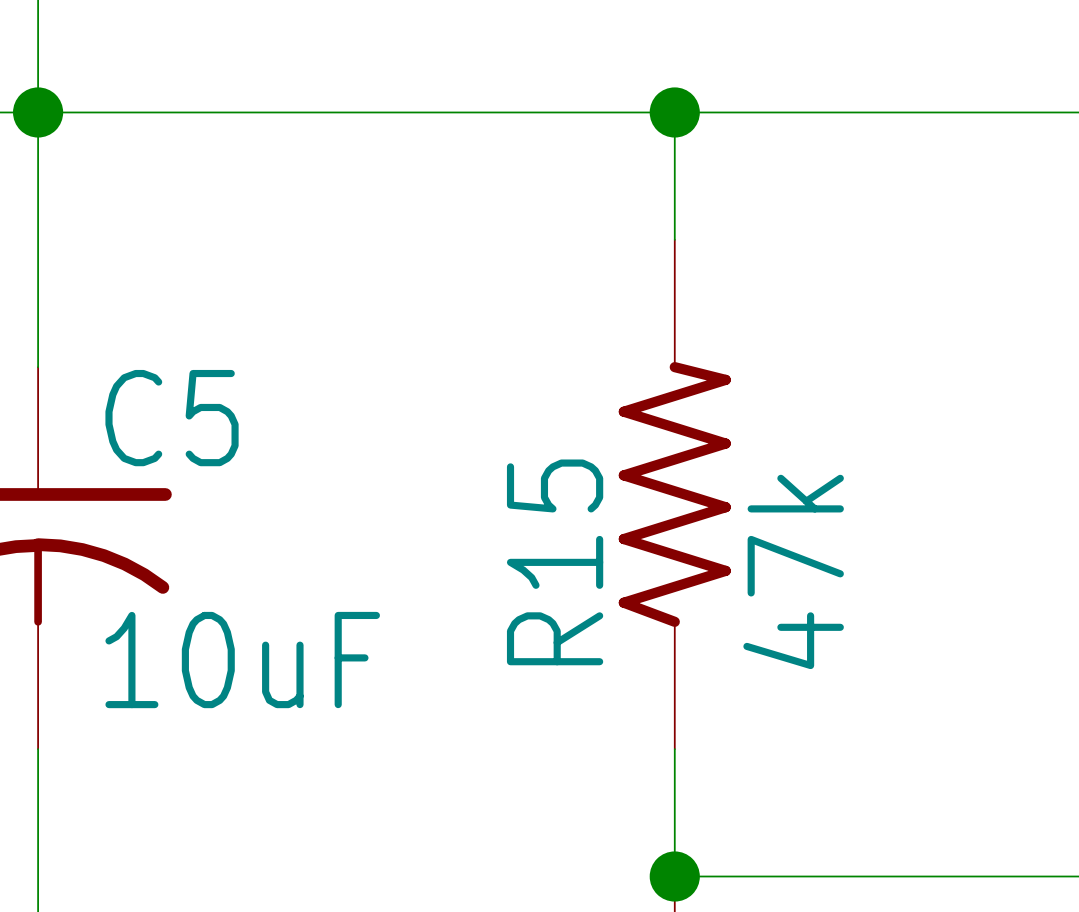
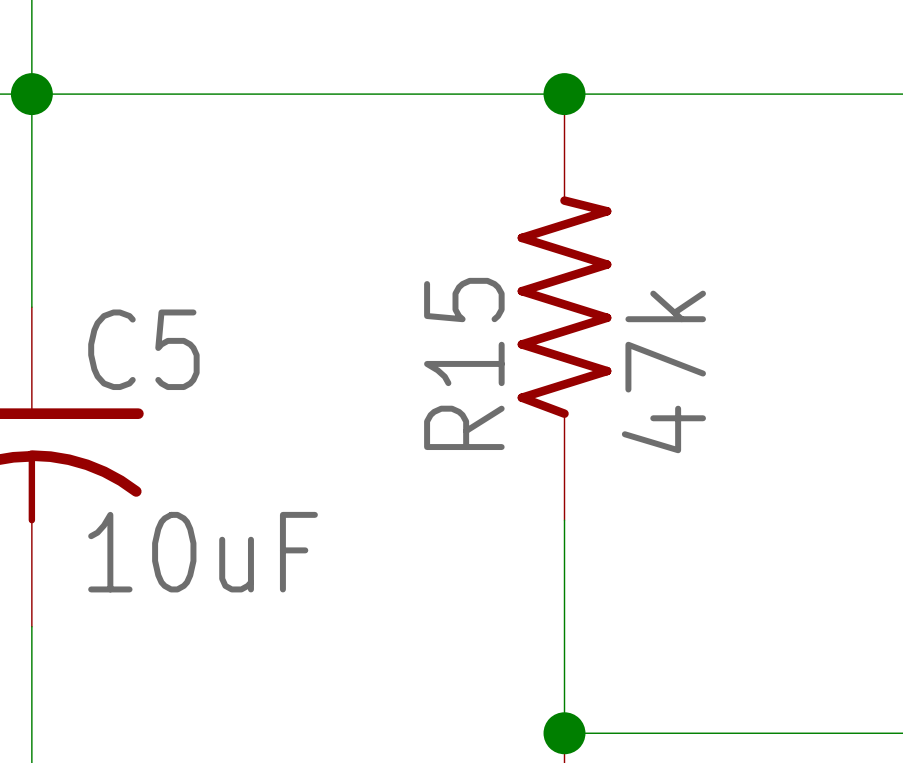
R15 position: (674, 494) -> (564, 307)

